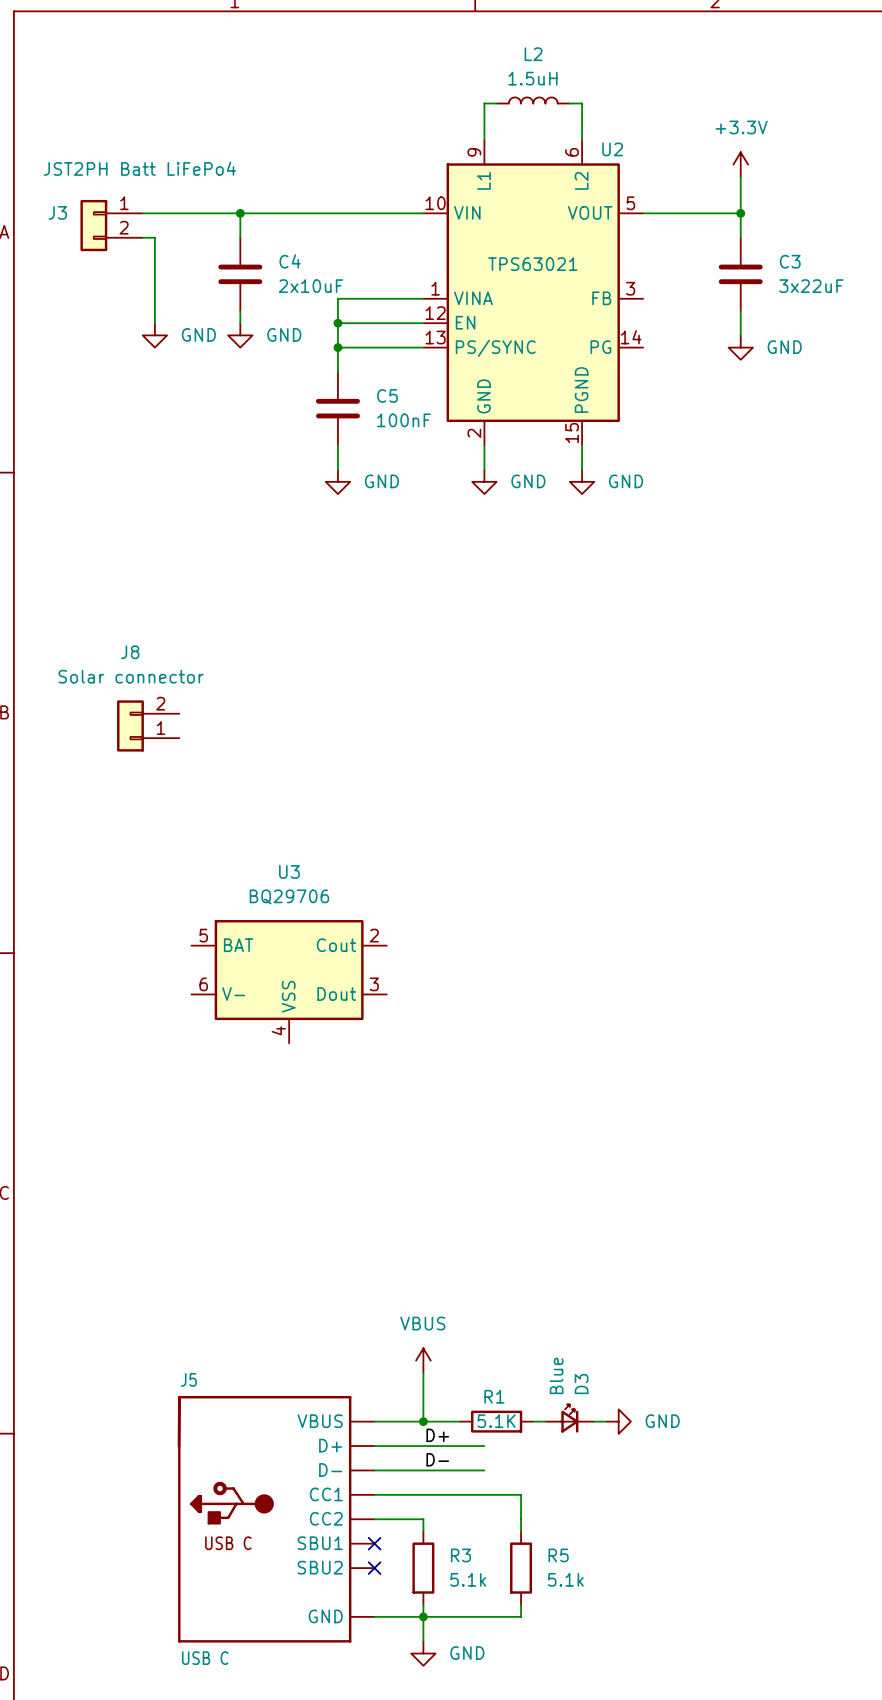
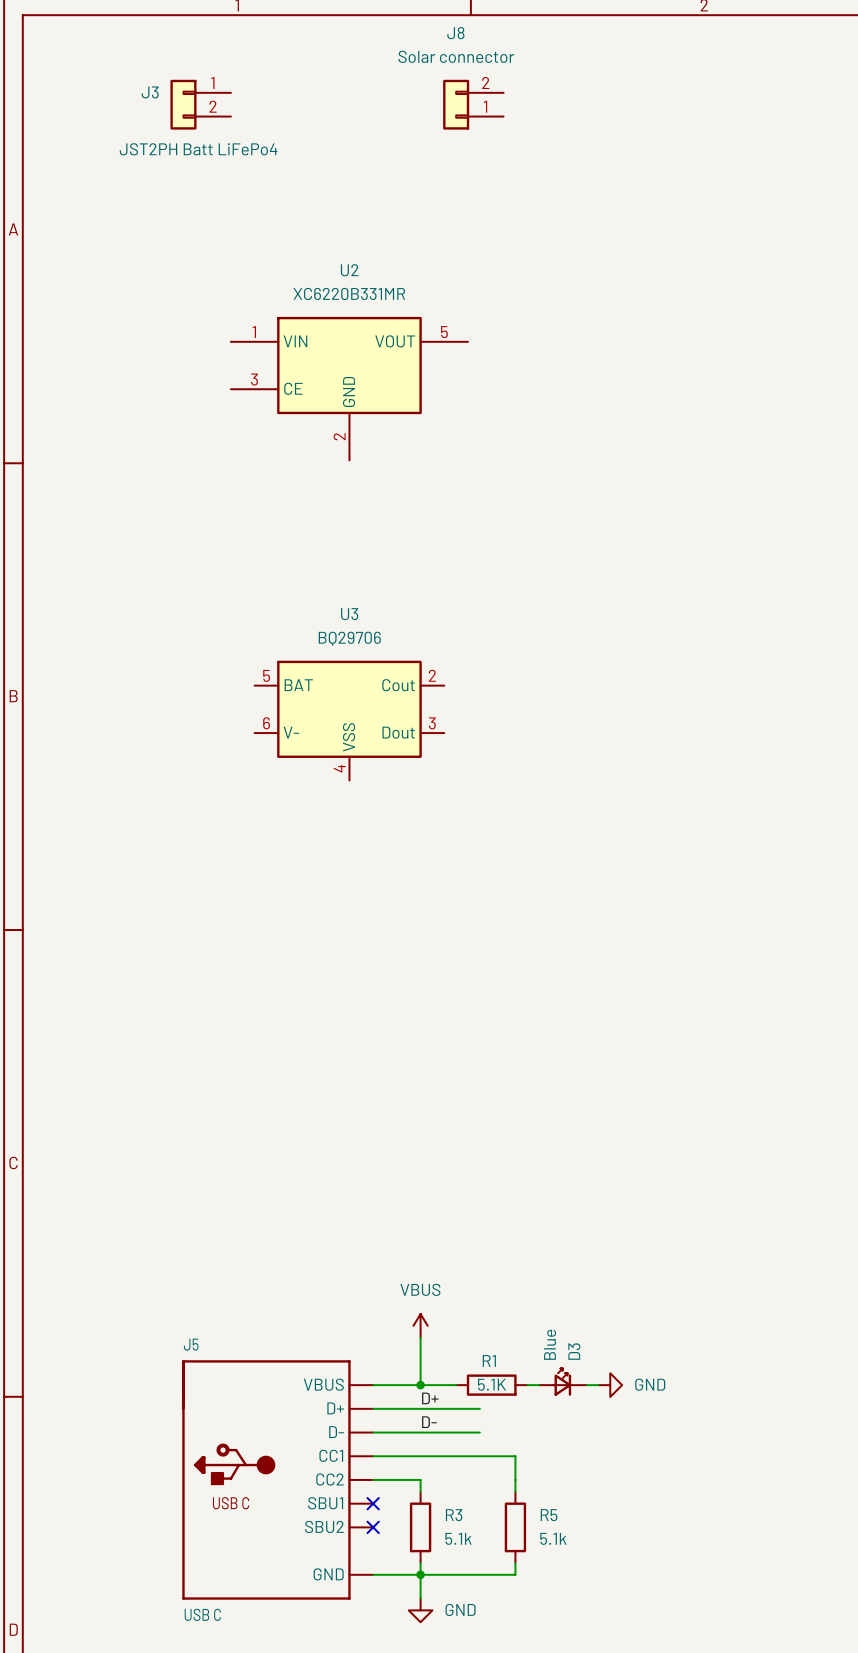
L2: 1.5uH (533, 100) -> none
wire: (496, 103) (484, 103) (484, 140) -> none
wire: (569, 103) (582, 103) (582, 140) -> none
U2 symbol: [423, 140, 644, 446] -> [230, 316, 469, 461]
U2 name position: U2 (612, 149) -> U2 (349, 270)
power symbol: +3.3V (740, 164) -> none
J3 value position: JST2PH Batt LiFePo4 (139, 168) -> JST2PH Batt LiFePo4 (198, 149)
wire: (740, 176) (740, 237) -> none
wire: (142, 213) (423, 213) -> none
wire: (240, 213) (240, 237) -> none
junction: (240, 213) -> none
wire: (643, 213) (740, 213) -> none
junction: (740, 213) -> none
J3 position: (111, 225) -> (200, 104)
wire: (142, 237) (154, 237) (154, 323) -> none
U2 value: TPS63021 (532, 264) -> XC6220B331MR (349, 293)
C4: 2x10uF (240, 274) -> none
C3: 3x22uF (740, 274) -> none
wire: (423, 298) (337, 298) (337, 372) -> none
wire: (240, 310) (240, 323) -> none
wire: (740, 310) (740, 335) -> none
junction: (337, 323) -> none
power symbol: GND (154, 335) -> none
power symbol: GND (240, 335) -> none
junction: (337, 347) -> none
power symbol: GND (740, 347) -> none
C5: 100nF (337, 408) -> none
wire: (337, 445) (337, 469) -> none
wire: (484, 445) (484, 469) -> none
wire: (582, 445) (582, 469) -> none
power symbol: GND (337, 481) -> none
power symbol: GND (484, 481) -> none
power symbol: GND (582, 481) -> none
J8 position: (148, 725) -> (473, 104)
U3 position: (289, 981) -> (349, 720)

